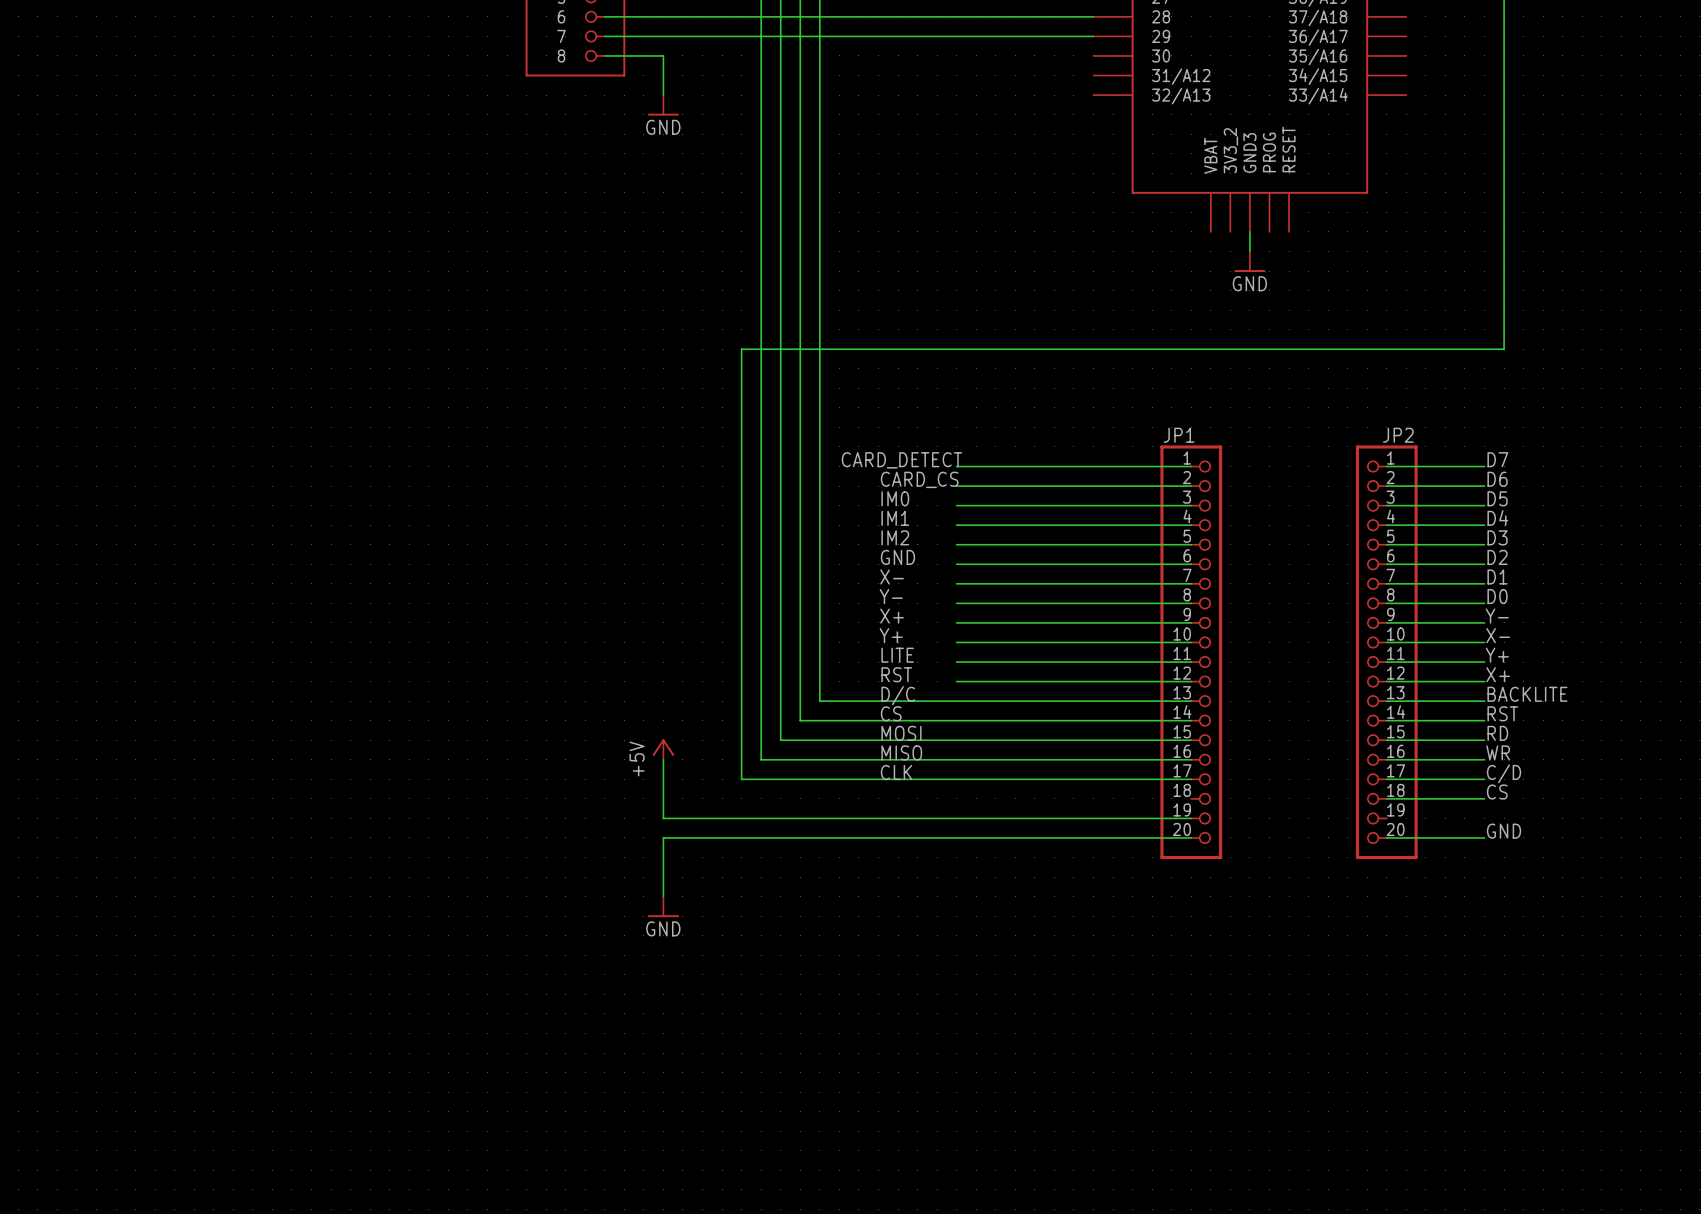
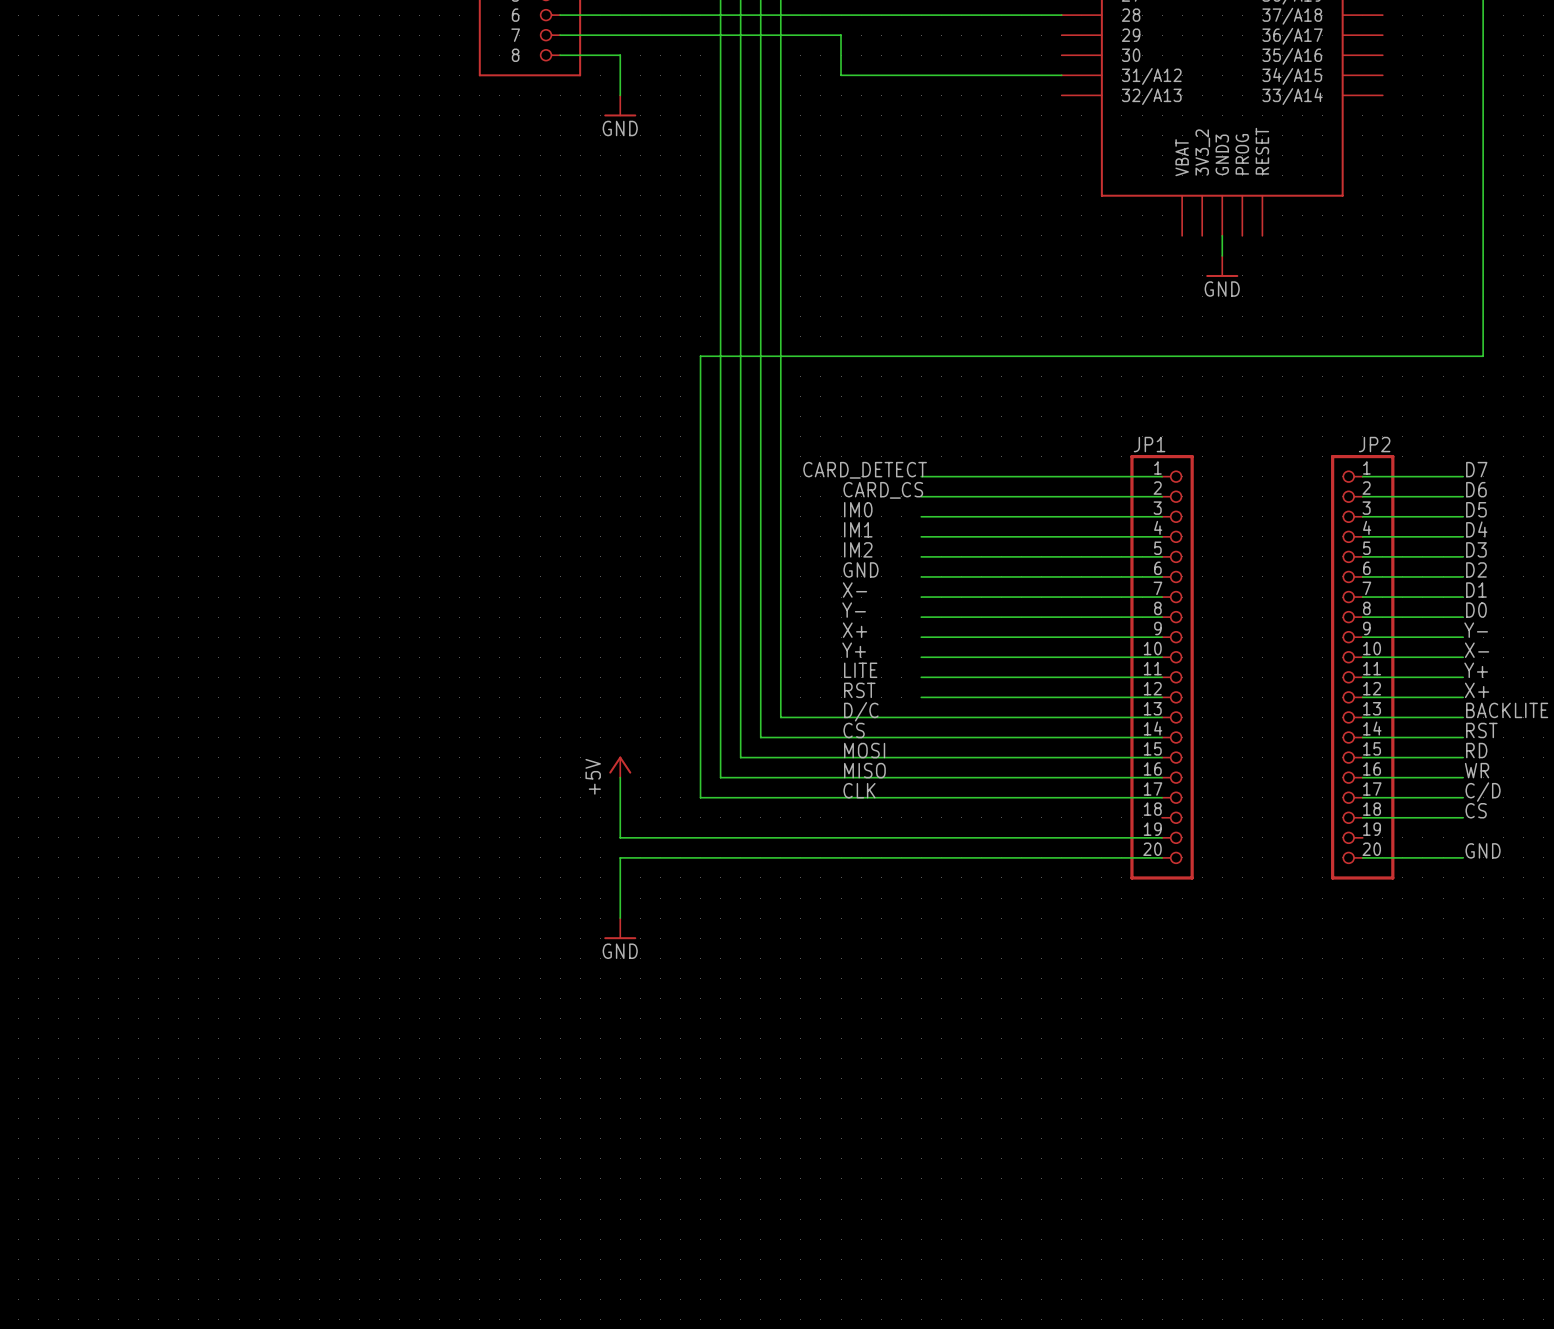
wire: (878, 36) (1093, 36) -> (841, 35) (841, 75) (1061, 75)

